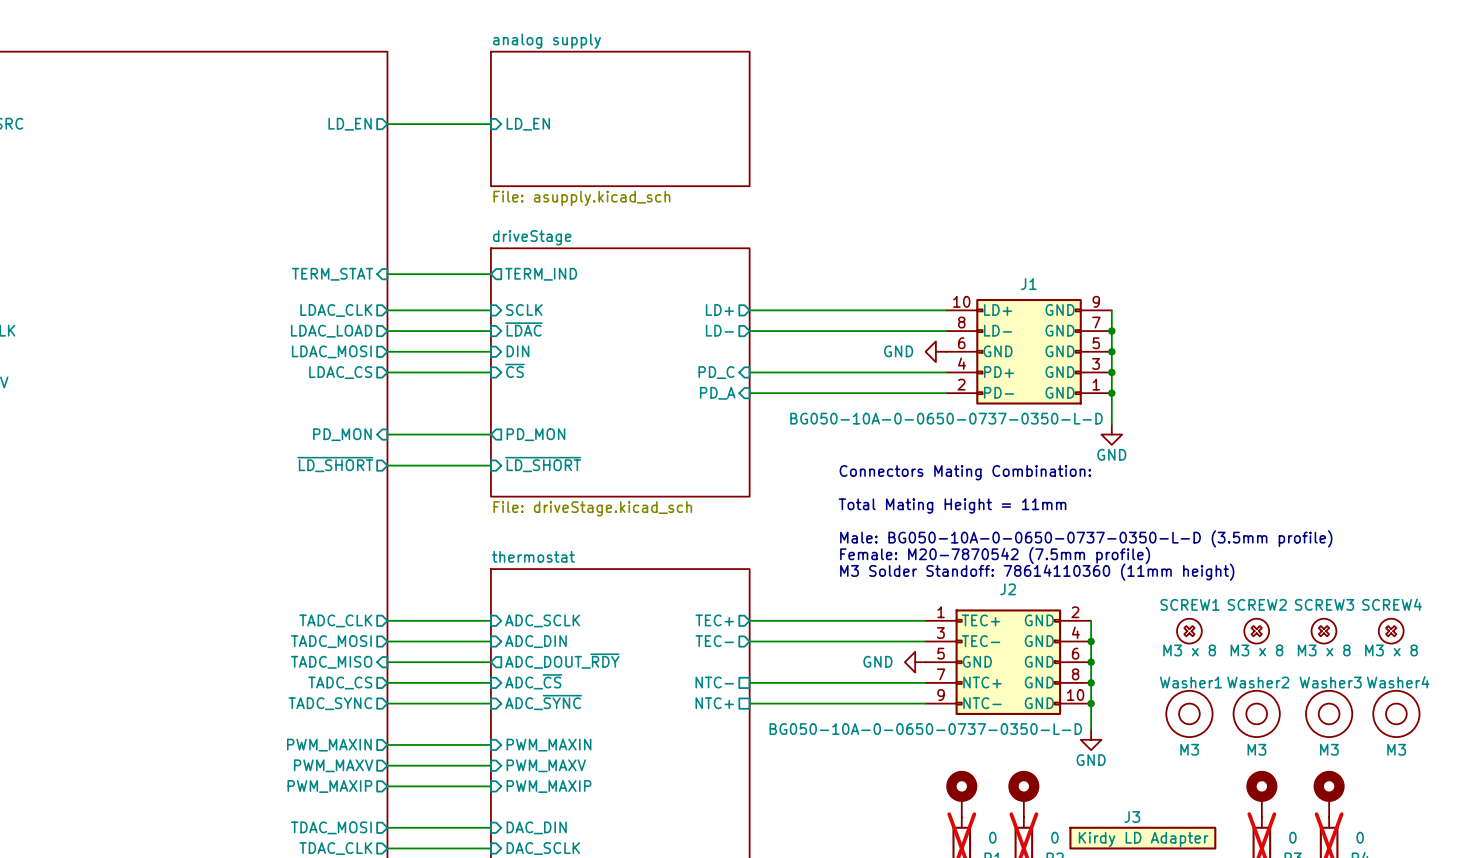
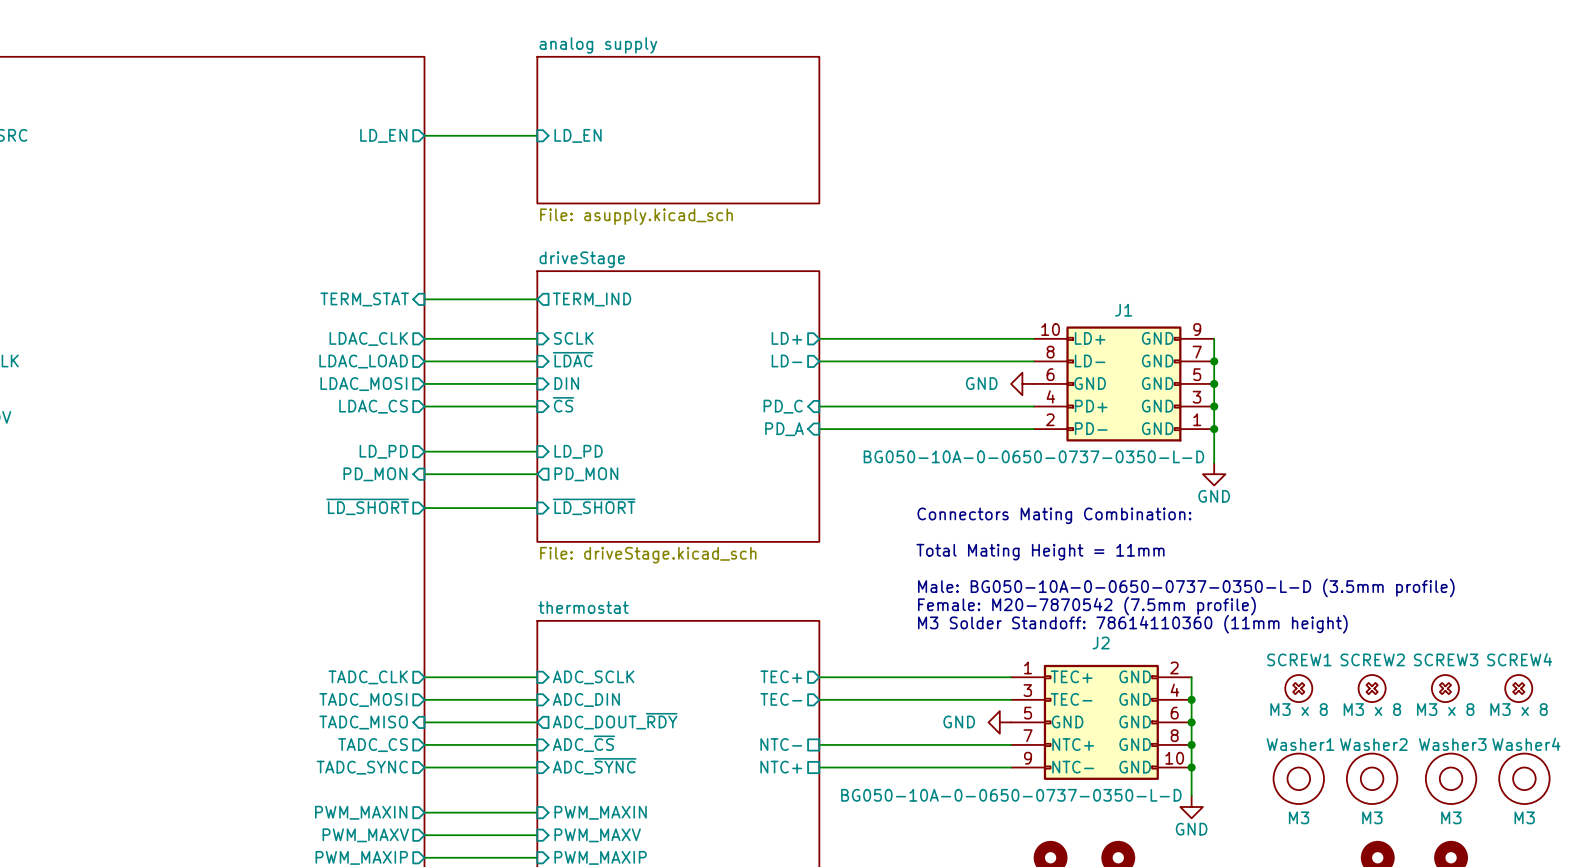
sheet pin: none -> LD_PD (383, 451)
wire: none -> (424, 451) (537, 451)
sheet pin: none -> LD_PD (578, 451)

